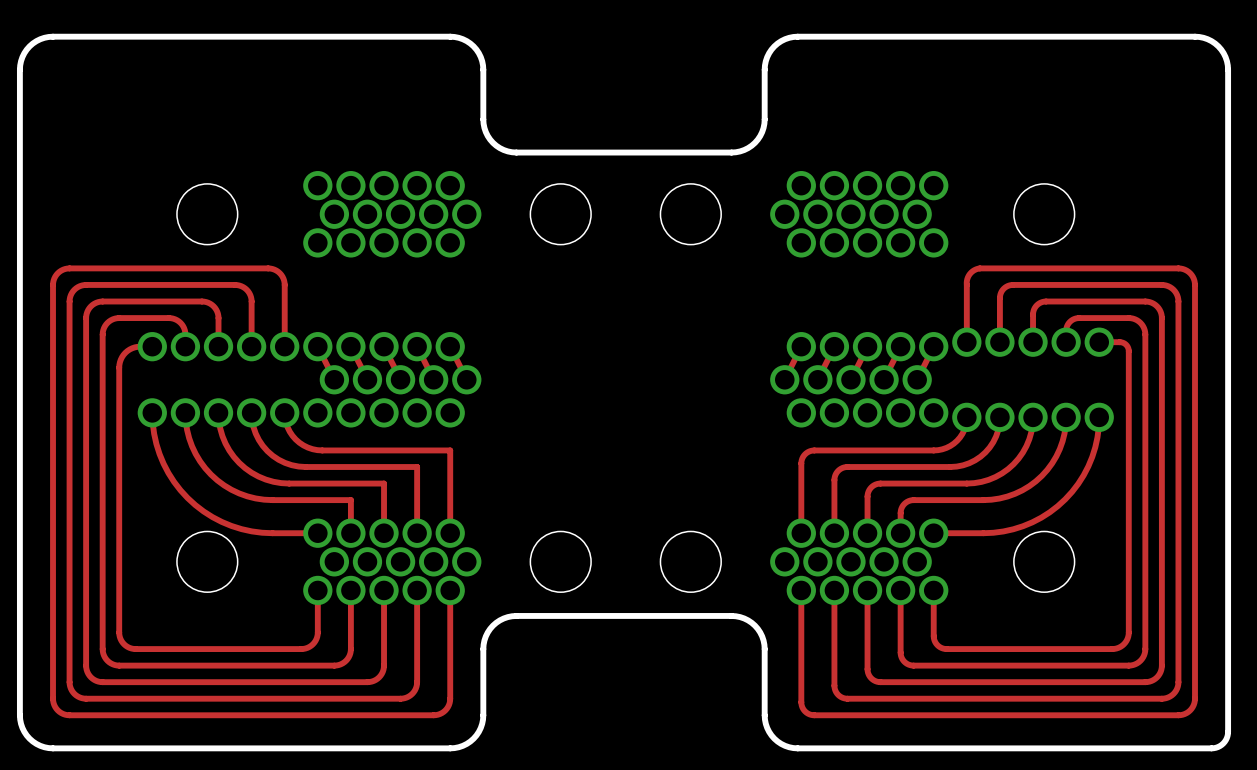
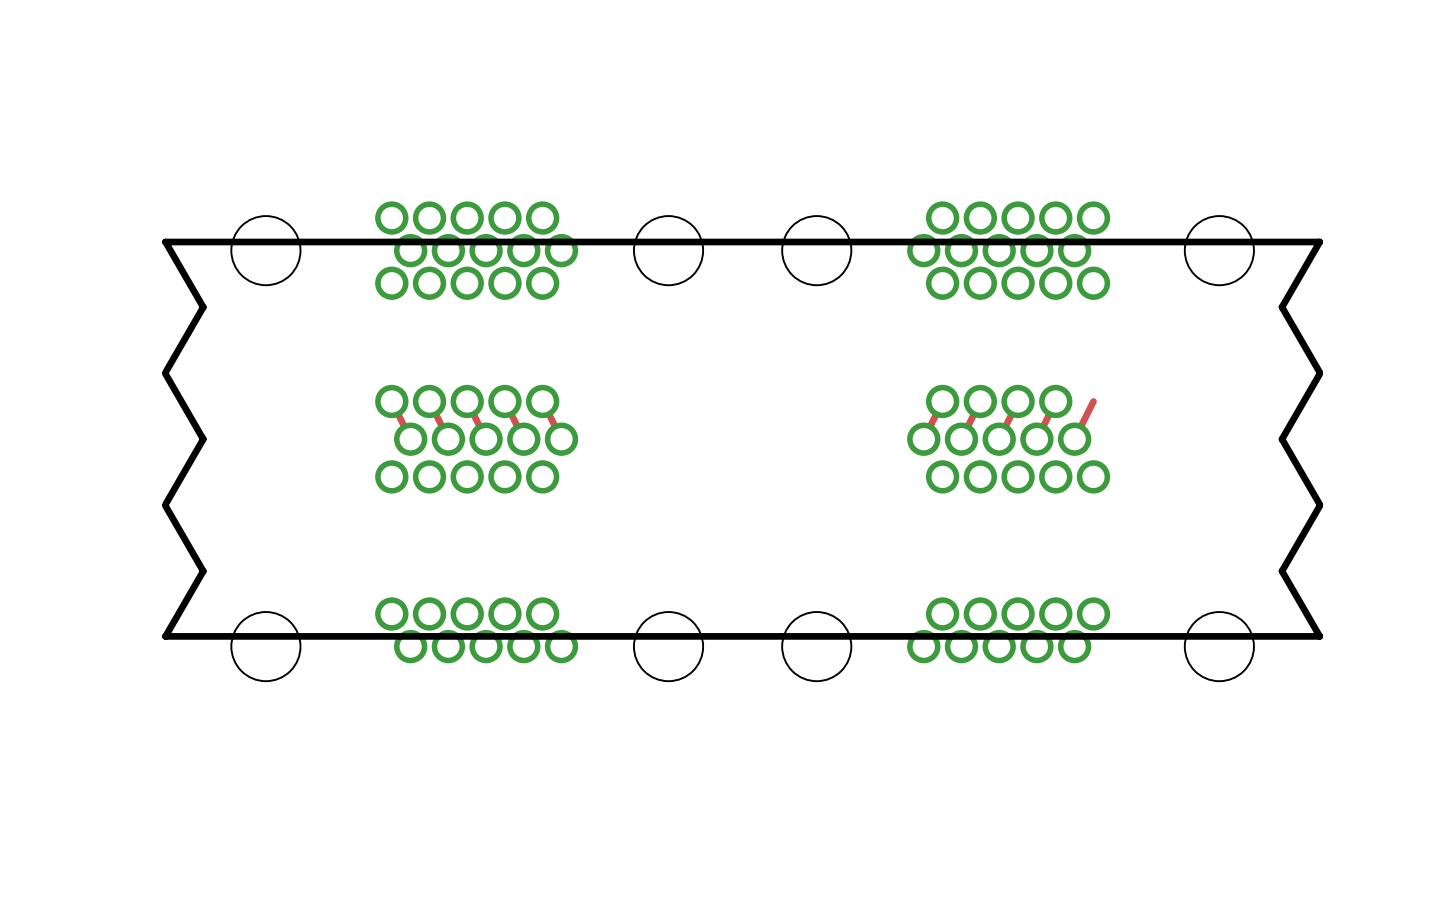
board edge: (53, 36) (458, 37) (473, 46) (482, 61) (483, 123) (487, 136) (499, 148) (516, 152) (731, 152) (744, 150) (754, 142) (763, 128) (764, 69) (767, 57) (777, 43) (793, 36) (1195, 36) (1211, 41) (1223, 53) (1228, 69) (1228, 731) (1225, 740) (1219, 746) (1211, 748) (793, 748) (777, 741) (767, 727) (764, 715) (763, 640) (754, 625) (744, 618) (731, 615) (516, 615) (507, 617) (496, 622) (485, 636) (483, 649) (482, 723) (473, 738) (458, 747) (53, 748) (36, 743) (24, 731) (19, 715) (19, 69) (22, 57) (29, 46) (40, 39) (53, 36) -> none
board edge: none -> (165, 372) (203, 307) (165, 242) (1319, 242) (1282, 307) (1319, 372)
board edge: none -> (165, 373) (203, 439) (165, 504)
board edge: none -> (1319, 373) (1282, 439) (1319, 504)
track: (966, 342) (966, 281) (971, 272) (977, 268) (1178, 268) (1186, 270) (1192, 276) (1195, 284) (1195, 698) (1192, 706) (1186, 713) (1178, 715) (810, 714) (805, 711) (801, 703) (801, 590) -> none
via: (966, 342) -> none
track: (999, 342) (1000, 296) (1002, 290) (1009, 285) (1161, 284) (1170, 287) (1176, 293) (1178, 301) (1178, 682) (1176, 690) (1170, 696) (1161, 698) (844, 698) (838, 694) (834, 687) (834, 590) -> none
via: (999, 342) -> none
track: (1033, 342) (1033, 311) (1036, 305) (1042, 301) (1147, 301) (1155, 304) (1160, 311) (1161, 665) (1159, 673) (1153, 679) (1145, 682) (877, 681) (870, 677) (867, 670) (867, 590) -> none
via: (1033, 342) -> none
track: (1066, 342) (1067, 326) (1071, 320) (1077, 318) (1130, 318) (1140, 322) (1144, 330) (1145, 649) (1143, 657) (1137, 663) (1128, 665) (910, 665) (904, 661) (900, 654) (900, 590) -> none
via: (1066, 342) -> none
track: (1099, 342) (1122, 342) (1128, 349) (1128, 632) (1126, 640) (1120, 646) (1112, 649) (943, 648) (936, 643) (933, 637) (933, 590) -> none
via: (1099, 342) -> none
track: (152, 346) (137, 346) (129, 349) (123, 354) (119, 364) (119, 632) (122, 642) (127, 646) (135, 649) (305, 648) (312, 644) (317, 636) (317, 590) -> none
via: (152, 346) -> none
track: (185, 346) (184, 328) (178, 321) (173, 318) (117, 318) (109, 321) (103, 330) (102, 649) (106, 659) (110, 663) (119, 665) (338, 665) (347, 659) (350, 651) (350, 590) -> none
via: (185, 346) -> none
track: (218, 346) (217, 313) (213, 306) (206, 302) (100, 301) (92, 304) (87, 311) (86, 665) (89, 675) (94, 679) (102, 682) (371, 681) (380, 675) (383, 667) (384, 590) -> none
via: (218, 346) -> none
track: (251, 346) (251, 297) (246, 289) (239, 285) (86, 284) (77, 287) (71, 293) (69, 301) (69, 682) (72, 692) (77, 696) (86, 698) (404, 698) (413, 692) (416, 684) (417, 590) -> none
via: (251, 346) -> none
track: (284, 346) (284, 282) (279, 273) (272, 268) (69, 268) (61, 270) (55, 276) (53, 284) (53, 698) (56, 708) (63, 714) (69, 715) (437, 714) (446, 708) (450, 700) (450, 590) -> none
via: (284, 346) -> none
via: (933, 346) -> none
track: (152, 412) (156, 444) (168, 473) (180, 490) (203, 511) (231, 525) (251, 531) (317, 533) -> none
via: (152, 412) -> none
track: (185, 412) (189, 438) (195, 454) (205, 468) (224, 485) (239, 493) (264, 499) (350, 500) (350, 533) -> none
via: (185, 412) -> none
track: (218, 412) (220, 428) (225, 443) (239, 462) (258, 476) (273, 481) (289, 483) -> none
via: (218, 412) -> none
track: (251, 412) (253, 426) (262, 445) (278, 459) (291, 465) (305, 467) (417, 467) (417, 533) -> none
via: (251, 412) -> none
track: (284, 412) (286, 422) (292, 435) (303, 445) (312, 449) (450, 450) (450, 533) -> none
via: (284, 412) -> none
track: (966, 417) (965, 425) (959, 437) (950, 446) (942, 449) (814, 450) (806, 453) (801, 463) (801, 533) -> none
via: (966, 417) -> none
track: (999, 417) (998, 430) (989, 447) (975, 460) (963, 465) (950, 467) (847, 467) (839, 469) (834, 478) (834, 533) -> none
via: (999, 417) -> none
track: (1033, 417) (1031, 432) (1022, 452) (1013, 464) (995, 477) (974, 483) (880, 483) (872, 486) (867, 494) (867, 533) -> none
via: (1033, 417) -> none
track: (1066, 417) (1062, 441) (1056, 456) (1047, 469) (1029, 486) (1015, 493) (991, 499) (908, 501) (901, 509) (900, 533) -> none
via: (1066, 417) -> none
track: (1099, 417) (1095, 447) (1088, 466) (1072, 491) (1049, 512) (1023, 526) (1003, 531) (933, 533) -> none
via: (1099, 417) -> none
board edge: none -> (165, 505) (203, 571) (165, 636) (1319, 636) (1282, 571) (1319, 505)
track: (289, 483) (384, 483) (384, 533) -> none
via: (317, 590) -> none
via: (350, 590) -> none
via: (384, 590) -> none
via: (417, 590) -> none
via: (450, 590) -> none
via: (801, 590) -> none
via: (834, 590) -> none
via: (867, 590) -> none
via: (900, 590) -> none
via: (933, 590) -> none

